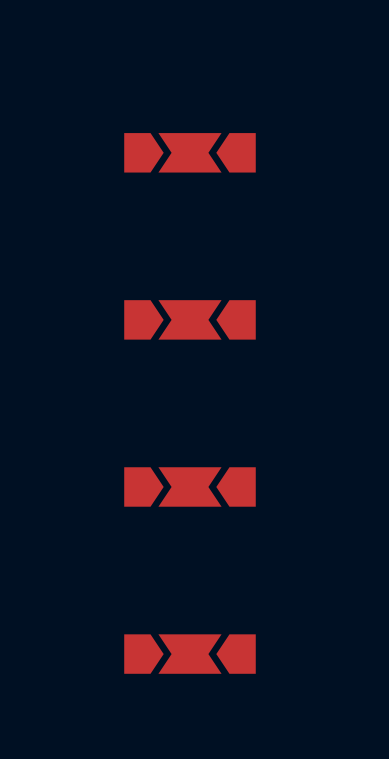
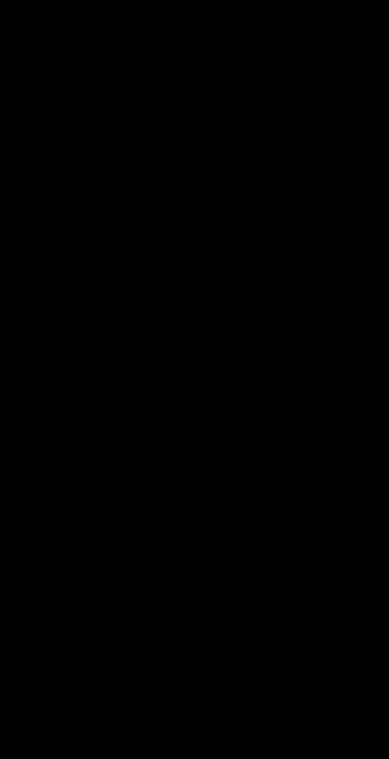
part: (189, 152) -> none
part: (189, 319) -> none
part: (189, 486) -> none
part: (189, 654) -> none

